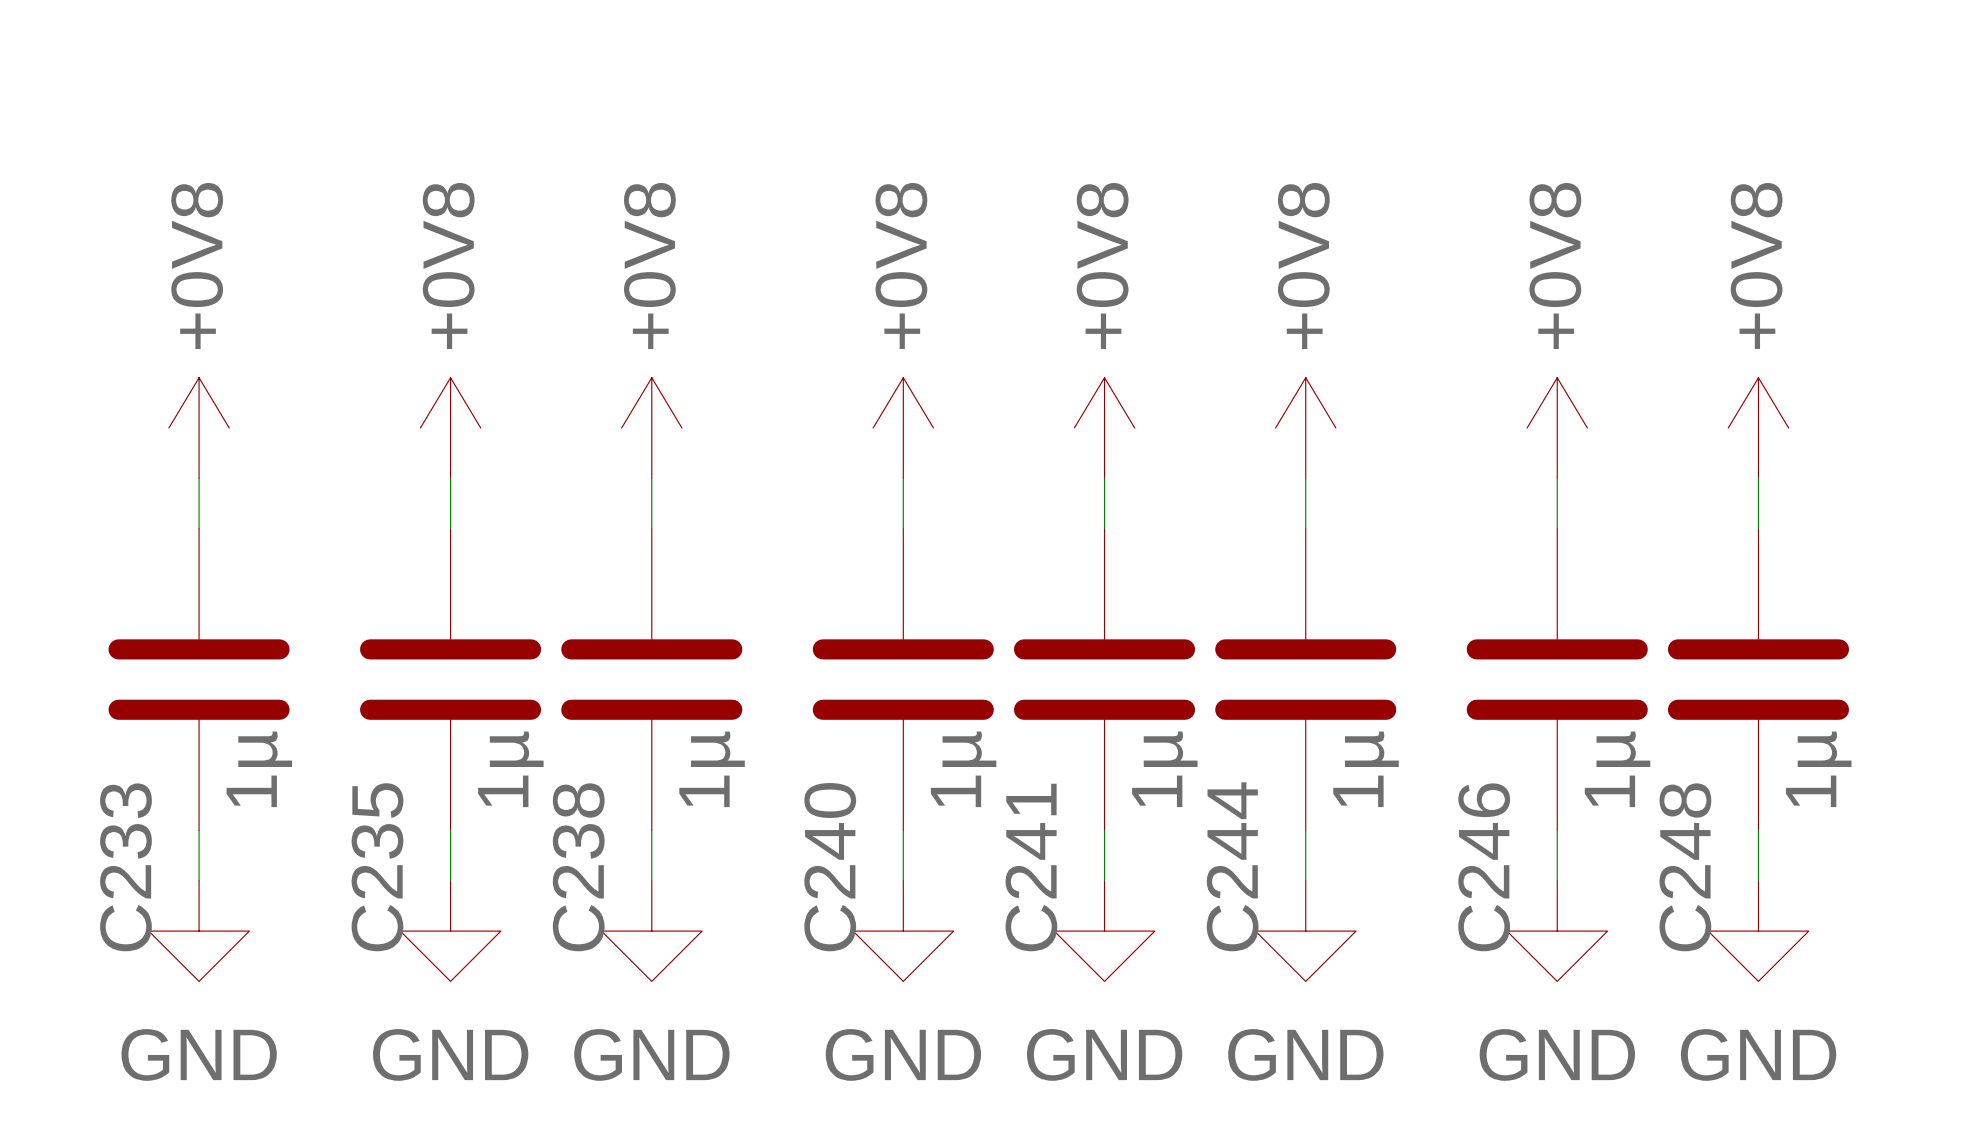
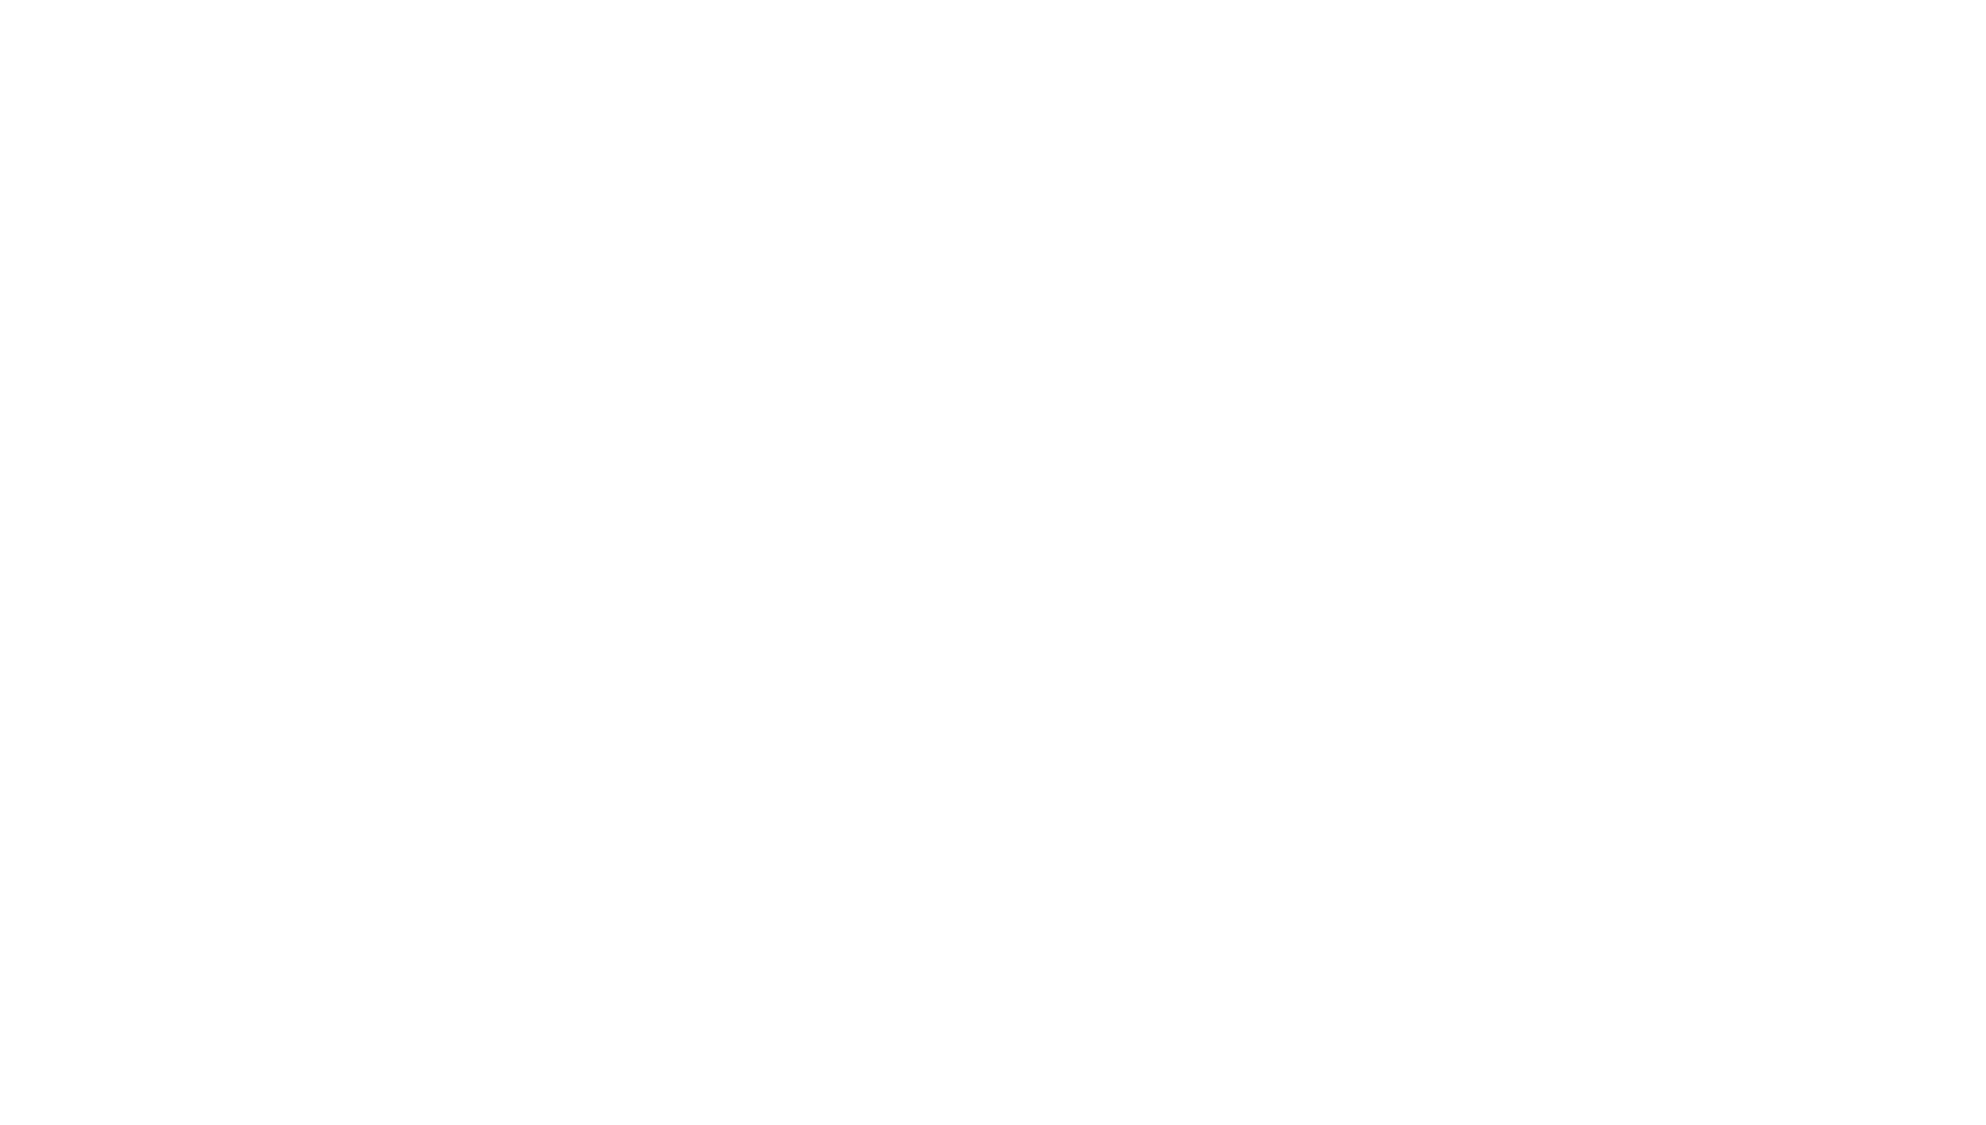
part: +0V8 (199, 428) -> none
part: +0V8 (450, 428) -> none
part: +0V8 (651, 428) -> none
part: +0V8 (903, 428) -> none
part: +0V8 (1104, 428) -> none
part: +0V8 (1305, 428) -> none
part: +0V8 (1557, 428) -> none
part: +0V8 (1758, 428) -> none
wire: (199, 478) (199, 528) -> none
wire: (450, 478) (450, 528) -> none
wire: (651, 478) (651, 528) -> none
wire: (903, 478) (903, 528) -> none
wire: (1104, 478) (1104, 528) -> none
wire: (1305, 478) (1305, 528) -> none
wire: (1557, 478) (1557, 528) -> none
wire: (1758, 478) (1758, 528) -> none
C233: 1µ (199, 679) -> none
C235: 1µ (450, 679) -> none
C238: 1µ (651, 679) -> none
C240: 1µ (903, 679) -> none
C241: 1µ (1104, 679) -> none
C244: 1µ (1305, 679) -> none
C246: 1µ (1557, 679) -> none
C248: 1µ (1758, 679) -> none
wire: (199, 830) (199, 880) -> none
wire: (450, 830) (450, 880) -> none
wire: (651, 830) (651, 880) -> none
wire: (903, 830) (903, 880) -> none
wire: (1104, 830) (1104, 880) -> none
wire: (1305, 830) (1305, 880) -> none
wire: (1557, 830) (1557, 880) -> none
wire: (1758, 830) (1758, 880) -> none
power symbol: GND (199, 931) -> none
power symbol: GND (450, 931) -> none
power symbol: GND (651, 931) -> none
power symbol: GND (903, 931) -> none
power symbol: GND (1104, 931) -> none
power symbol: GND (1305, 931) -> none
power symbol: GND (1557, 931) -> none
power symbol: GND (1758, 931) -> none

